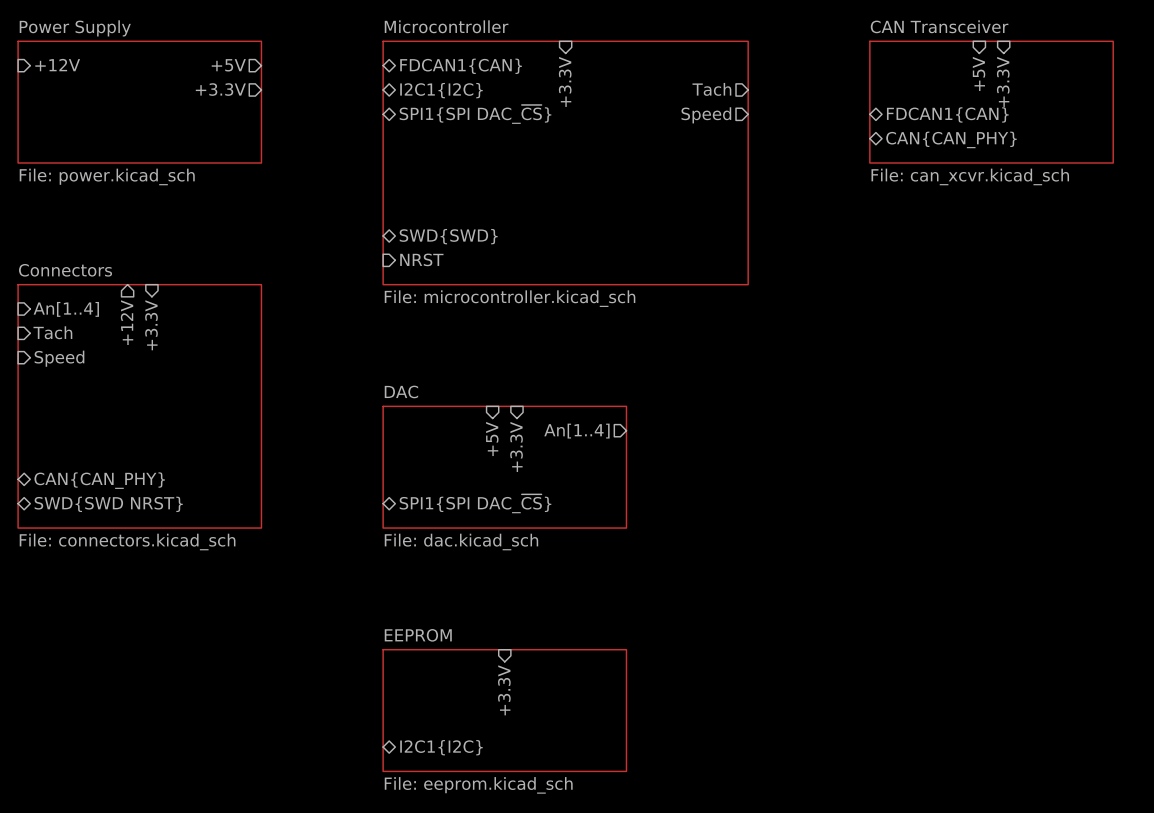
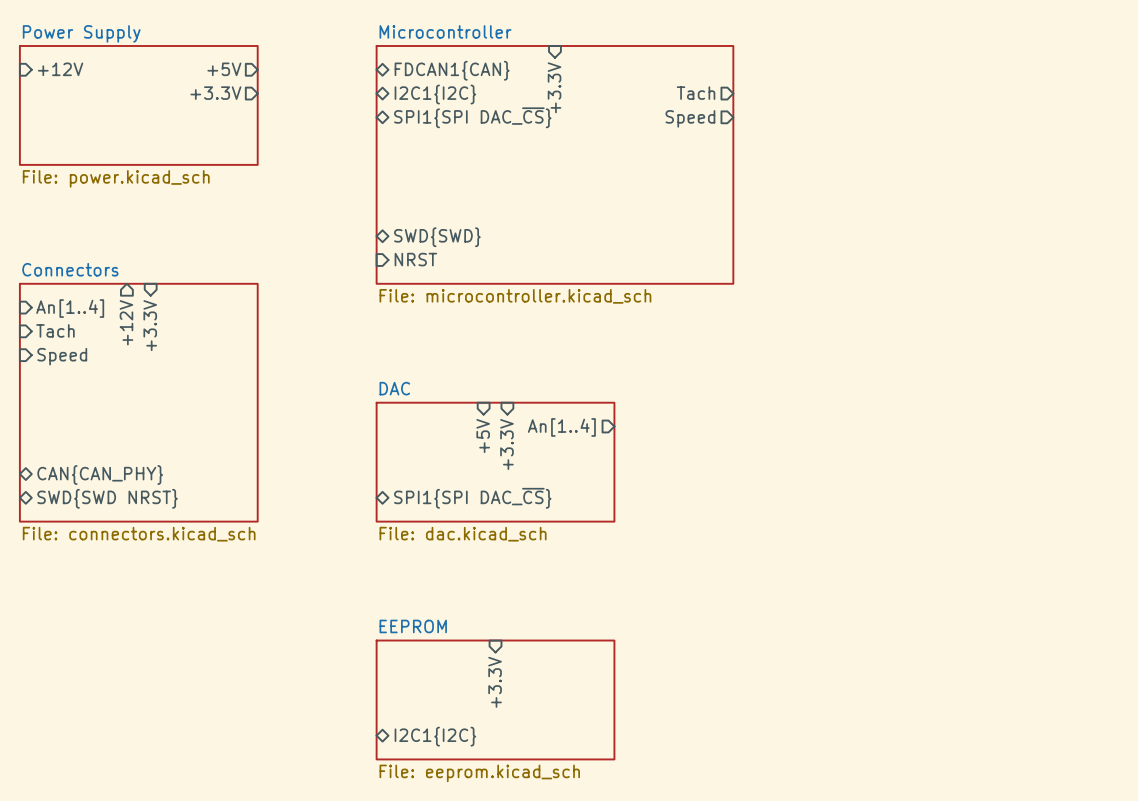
sheet pin: +5V (979, 73) -> none
sheet pin: +3.3V (1003, 81) -> none
sheet CAN Transceiver: File: can_xcvr.kicad_sch (991, 102) -> none
sheet pin: FDCAN1{CAN} (947, 114) -> none
sheet pin: CAN{CAN_PHY} (951, 139) -> none

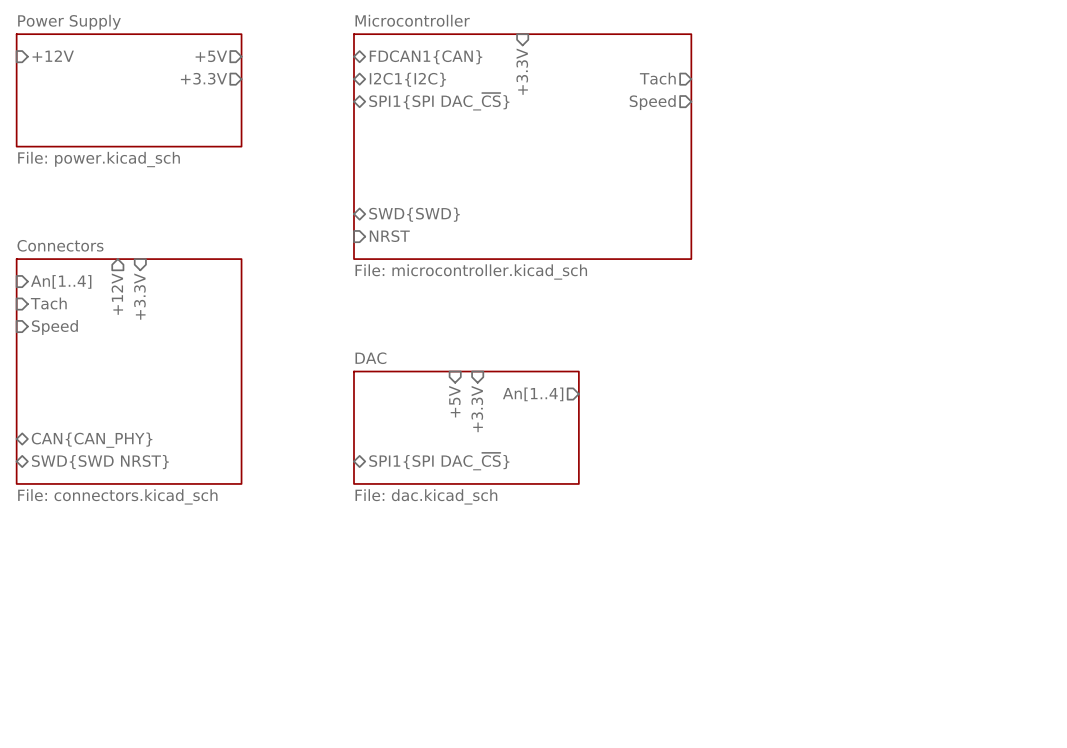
sheet pin: +3.3V (495, 682) -> none
sheet EEPROM: File: eeprom.kicad_sch (495, 699) -> none
sheet pin: I2C1{I2C} (435, 736) -> none

